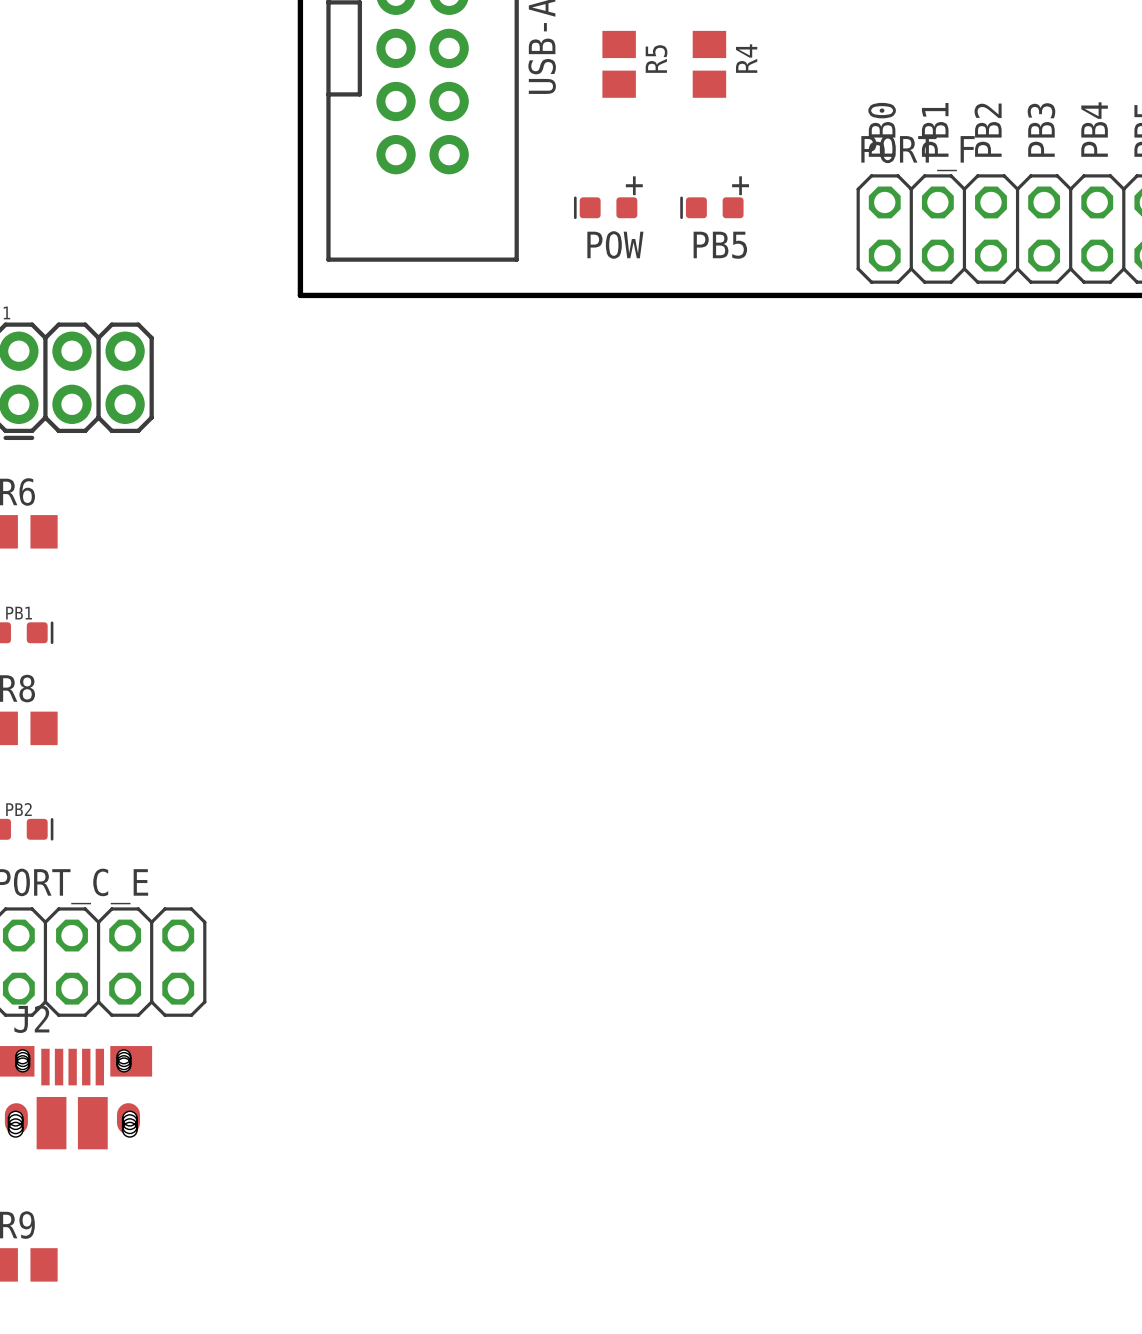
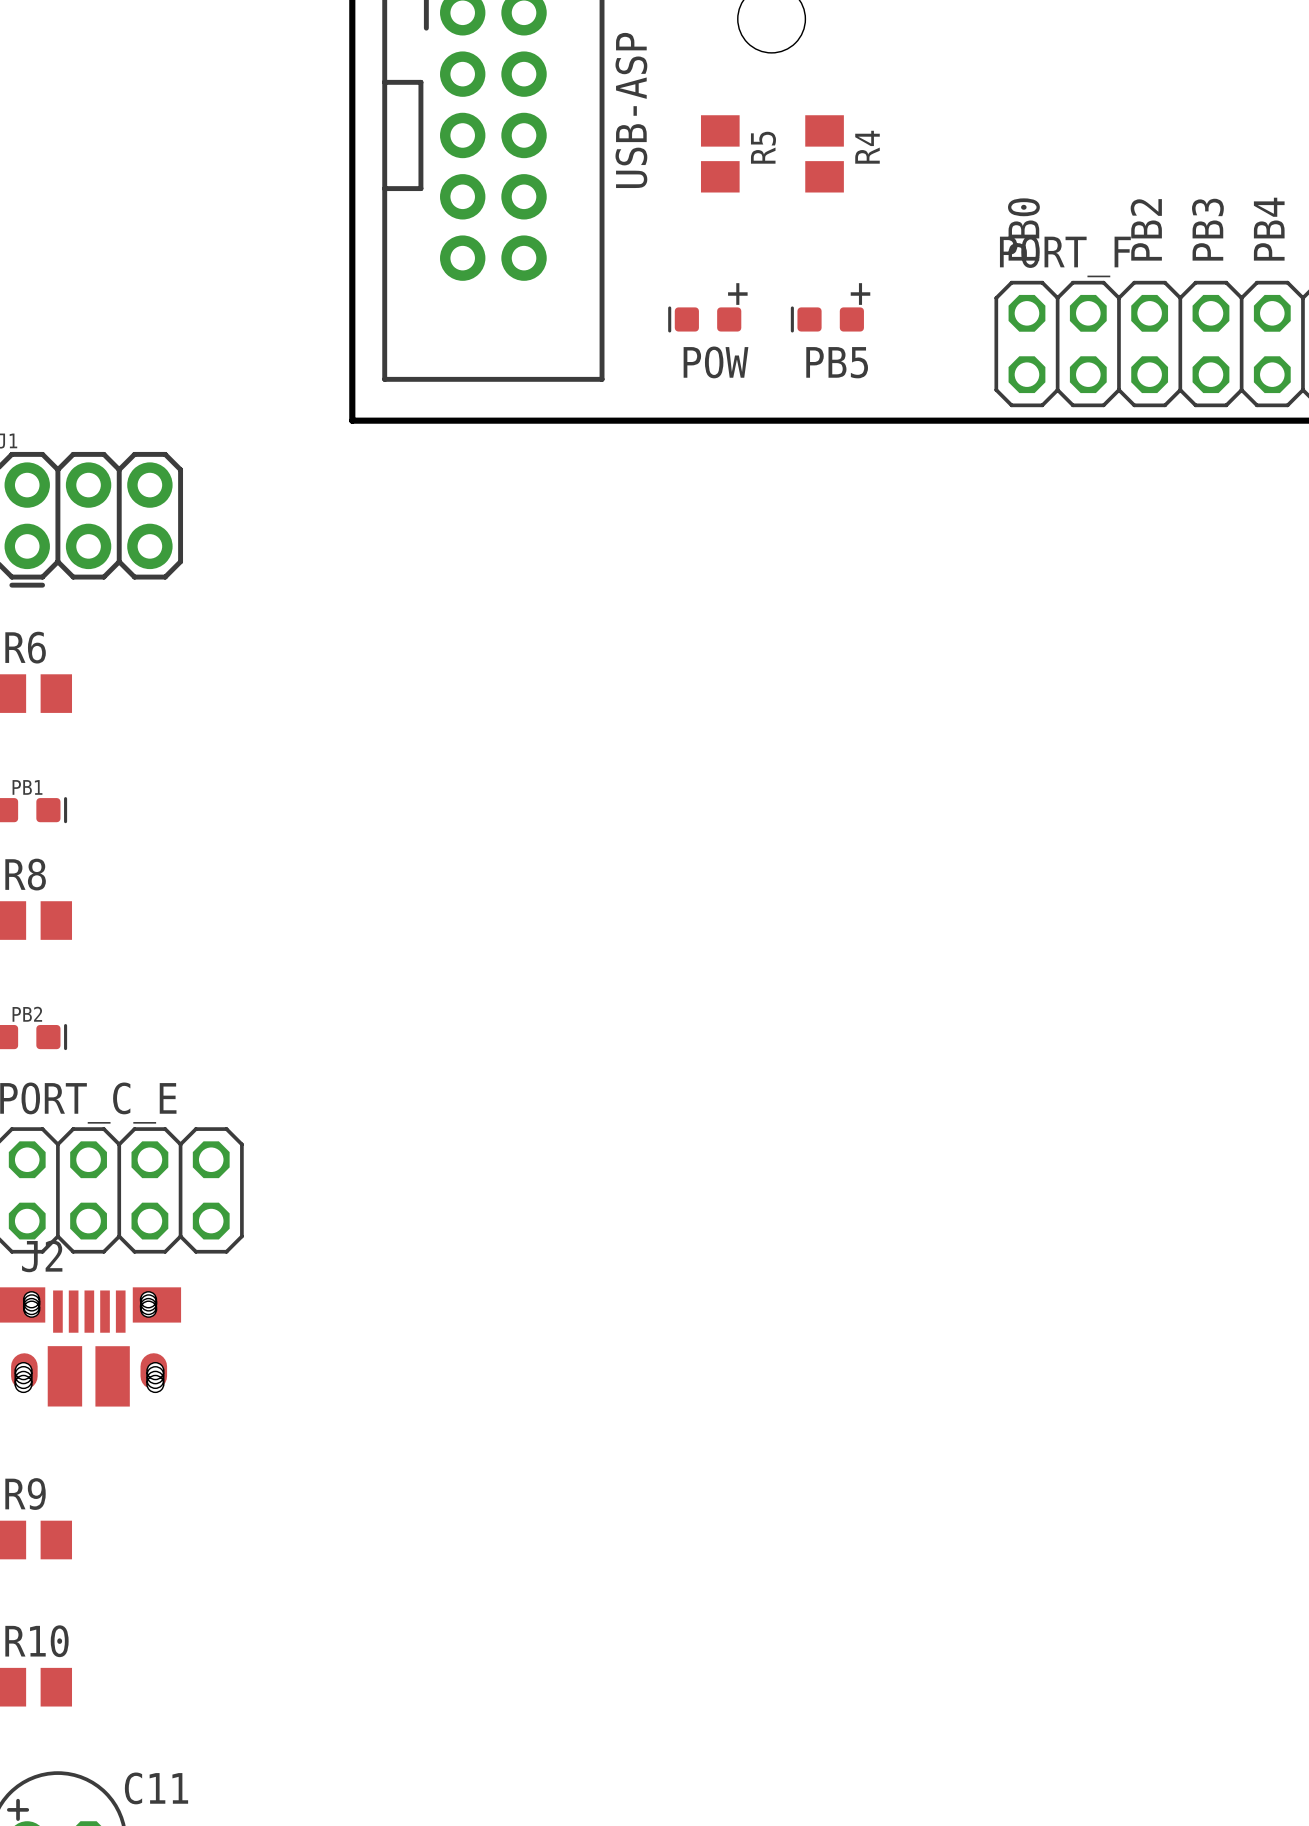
text: PB1 (935, 129) -> none

